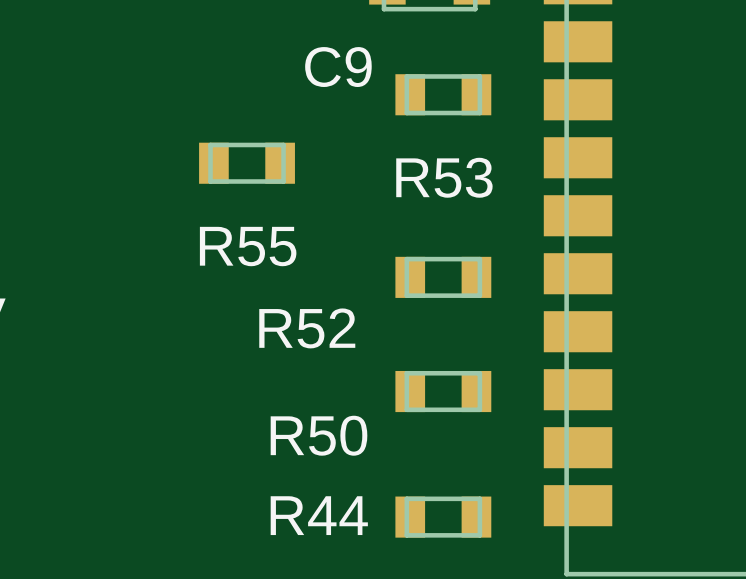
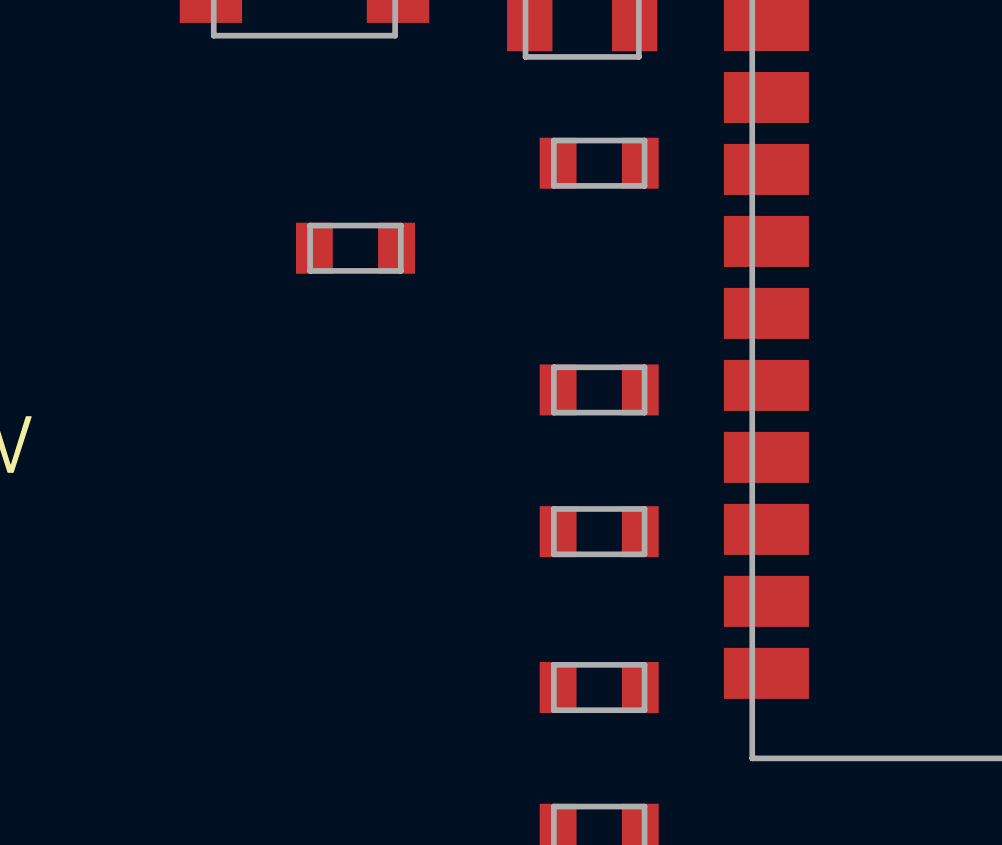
C9 name: C9 (338, 67) -> none
R53 name: R53 (444, 177) -> none
R55 name: R55 (248, 246) -> none
R52 name: R52 (307, 328) -> none
R50 name: R50 (319, 435) -> none
R44 name: R44 (319, 515) -> none

